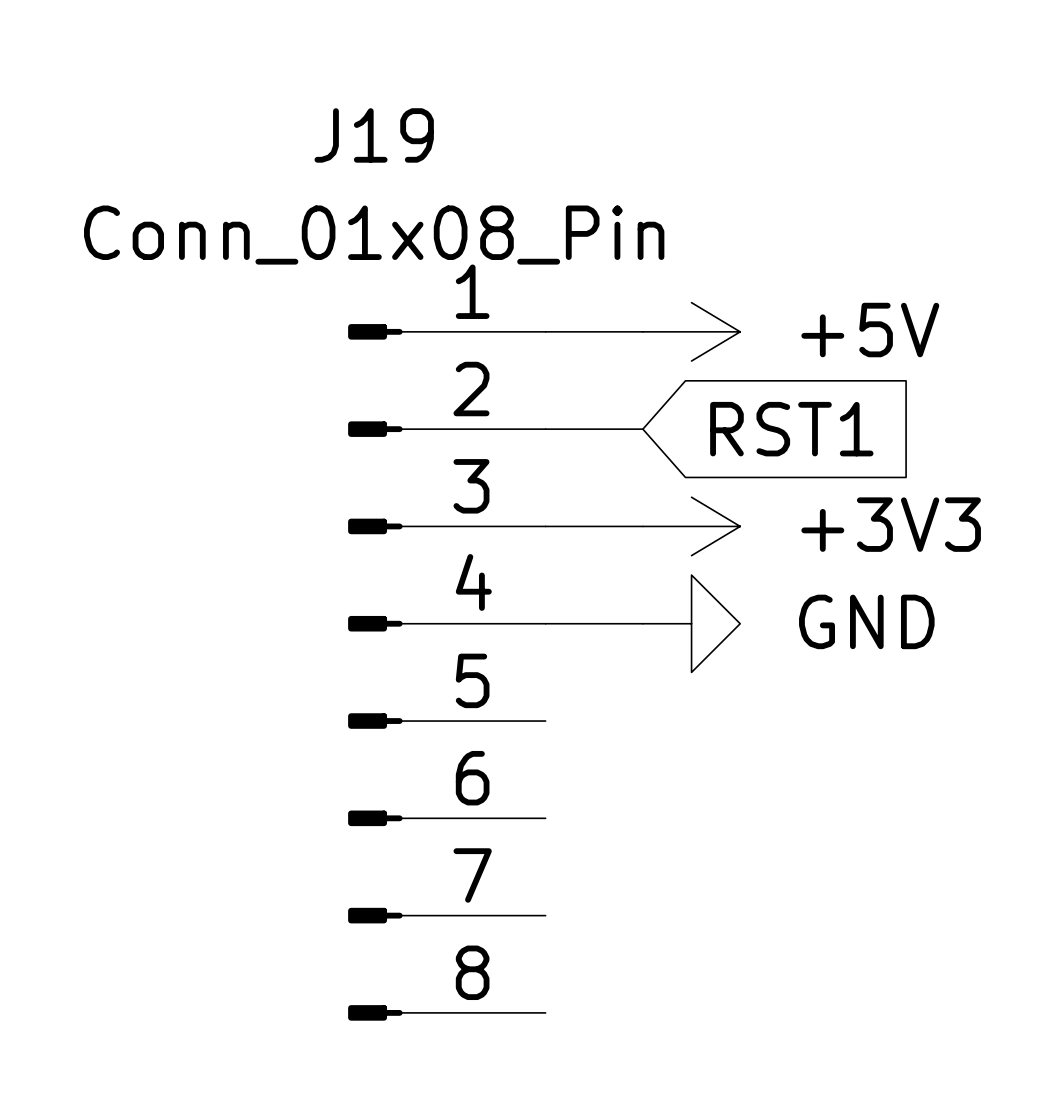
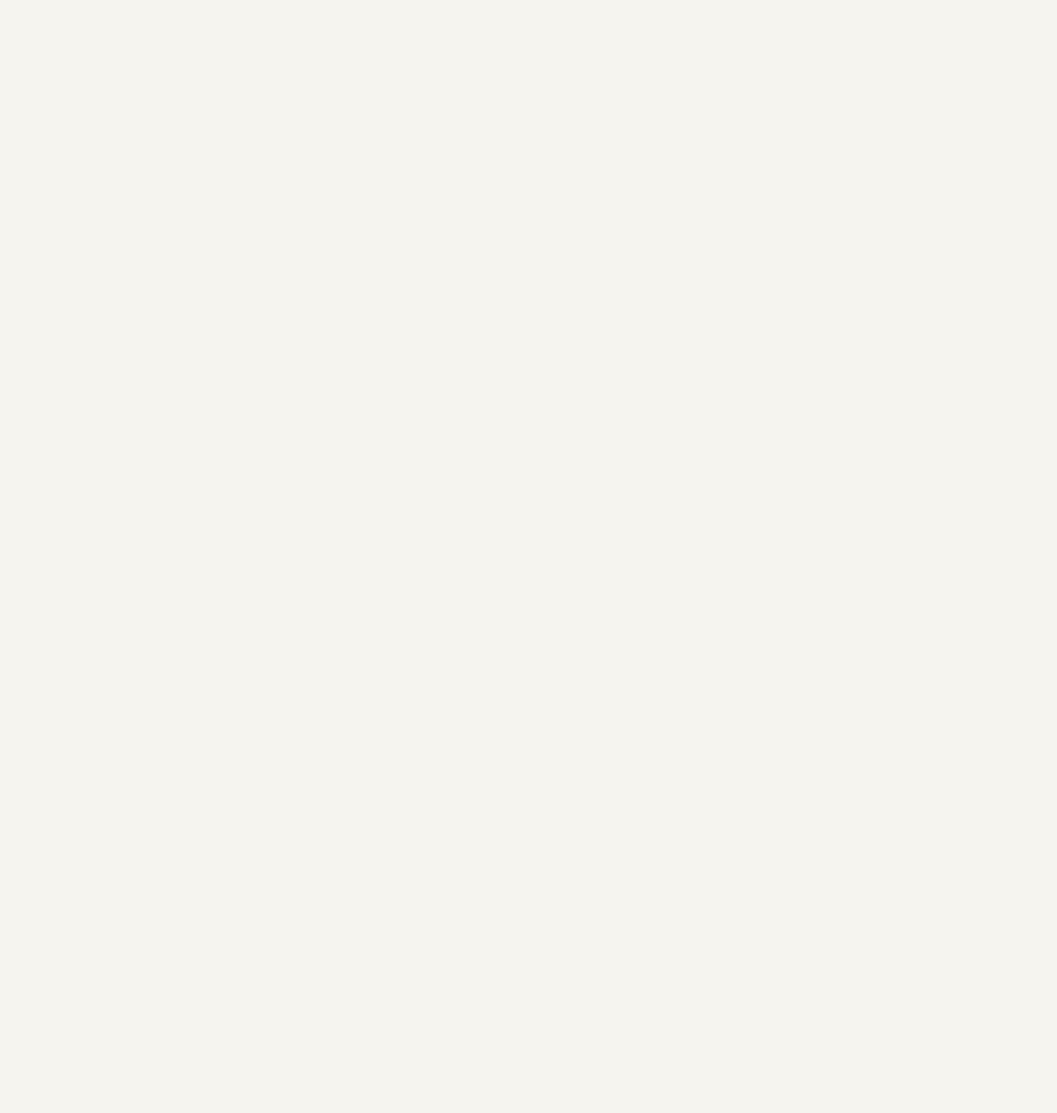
wire: (545, 331) (642, 331) -> none
power symbol: +5V (691, 331) -> none
wire: (545, 429) (642, 429) -> none
global label: RST1 (791, 429) -> none
wire: (545, 526) (642, 526) -> none
power symbol: +3V3 (691, 526) -> none
wire: (545, 623) (642, 623) -> none
power symbol: GND (691, 623) -> none
J19: Conn_01x08_Pin (446, 672) -> none

